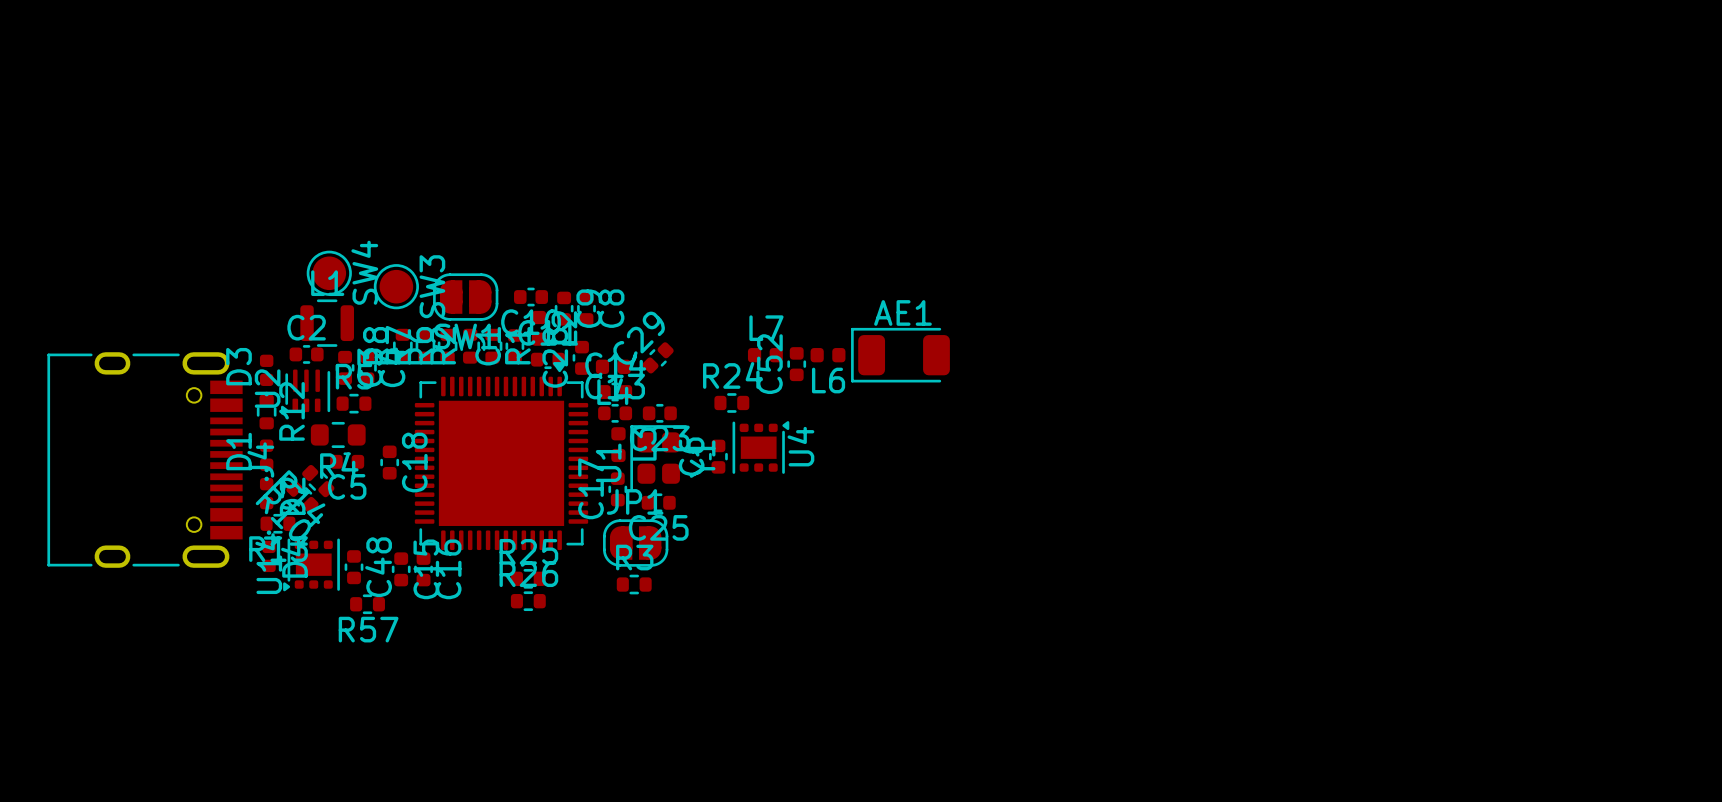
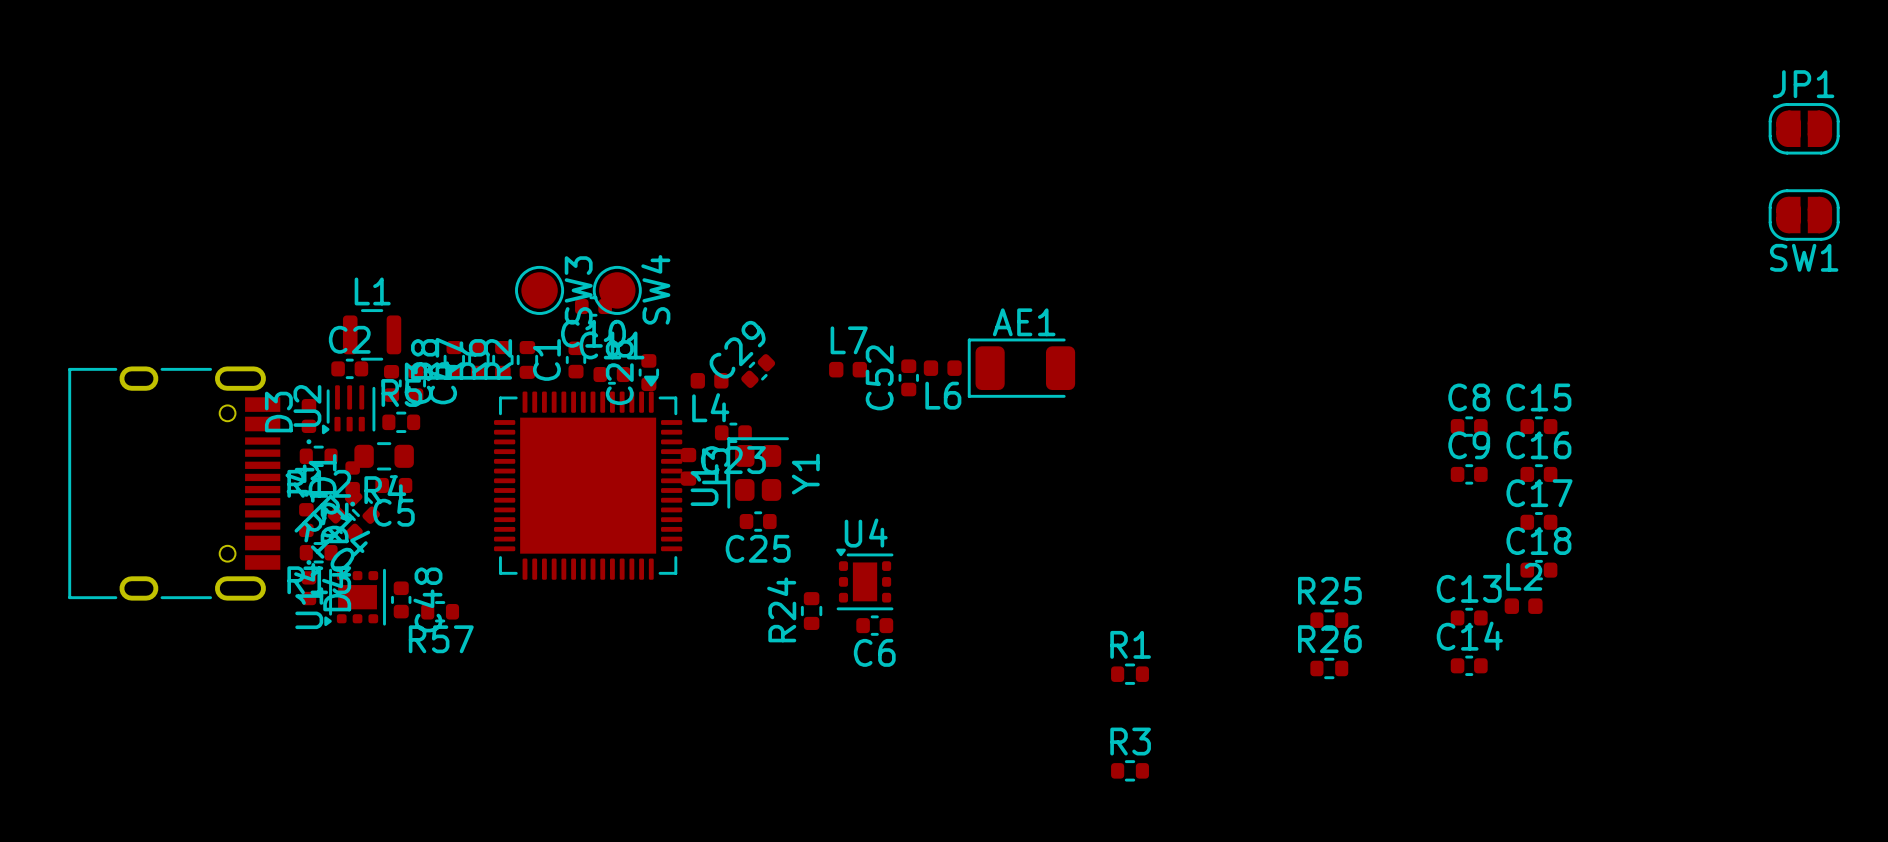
SW4 position: (329, 273) -> (617, 290)
SW3 position: (396, 286) -> (539, 290)
SW1 position: (465, 297) -> (1804, 215)
C9 rotation: 0° (564, 308) -> 90° clockwise (1469, 474)
C9 position: (564, 308) -> (1469, 474)
C8 rotation: 0° (586, 308) -> 90° clockwise (1469, 426)
C8 position: (586, 308) -> (1469, 426)
L2 rotation: 0° (539, 328) -> 90° clockwise (1523, 606)
L2 position: (539, 328) -> (1523, 606)
R1 rotation: 0° (492, 346) -> 90° clockwise (1130, 674)
R1 position: (492, 346) -> (1130, 674)
L6 position: (828, 355) -> (942, 368)
AE1 position: (900, 355) -> (1021, 368)
C29 position: (658, 357) -> (758, 371)
C52 position: (796, 364) -> (908, 377)
L4 position: (613, 366) -> (709, 380)
D3 position: (266, 375) -> (308, 421)
C14 position: (615, 392) -> (1469, 665)
R24 rotation: 0° (731, 402) -> 90° clockwise (811, 611)
R24 position: (731, 402) -> (811, 611)
R12 rotation: 0° (266, 411) -> 90° clockwise (318, 456)
R12 position: (266, 411) -> (318, 456)
C13 position: (615, 413) -> (1469, 617)
U4 rotation: 0° (760, 447) -> 90° counterclockwise (864, 579)
U4 position: (760, 447) -> (864, 579)
U1 position: (501, 456) -> (588, 477)
C6 rotation: 0° (718, 456) -> 90° clockwise (874, 625)
C6 position: (718, 456) -> (874, 625)
Y1 position: (658, 458) -> (758, 472)
D1 position: (266, 460) -> (352, 483)
C18 rotation: 0° (389, 462) -> 90° clockwise (1538, 570)
C18 position: (389, 462) -> (1538, 570)
C17 rotation: 0° (617, 489) -> 90° clockwise (1538, 522)
C17 position: (617, 489) -> (1538, 522)
C25 position: (658, 502) -> (758, 521)
JP1 position: (635, 543) -> (1804, 128)
C15 rotation: 0° (401, 569) -> 90° clockwise (1538, 426)
C15 position: (401, 569) -> (1538, 426)
C16 rotation: 0° (423, 569) -> 90° clockwise (1538, 474)
C16 position: (423, 569) -> (1538, 474)
R25 position: (528, 578) -> (1329, 620)
R3 position: (634, 584) -> (1130, 770)
R26 position: (528, 601) -> (1329, 668)
R57 position: (367, 604) -> (440, 611)

